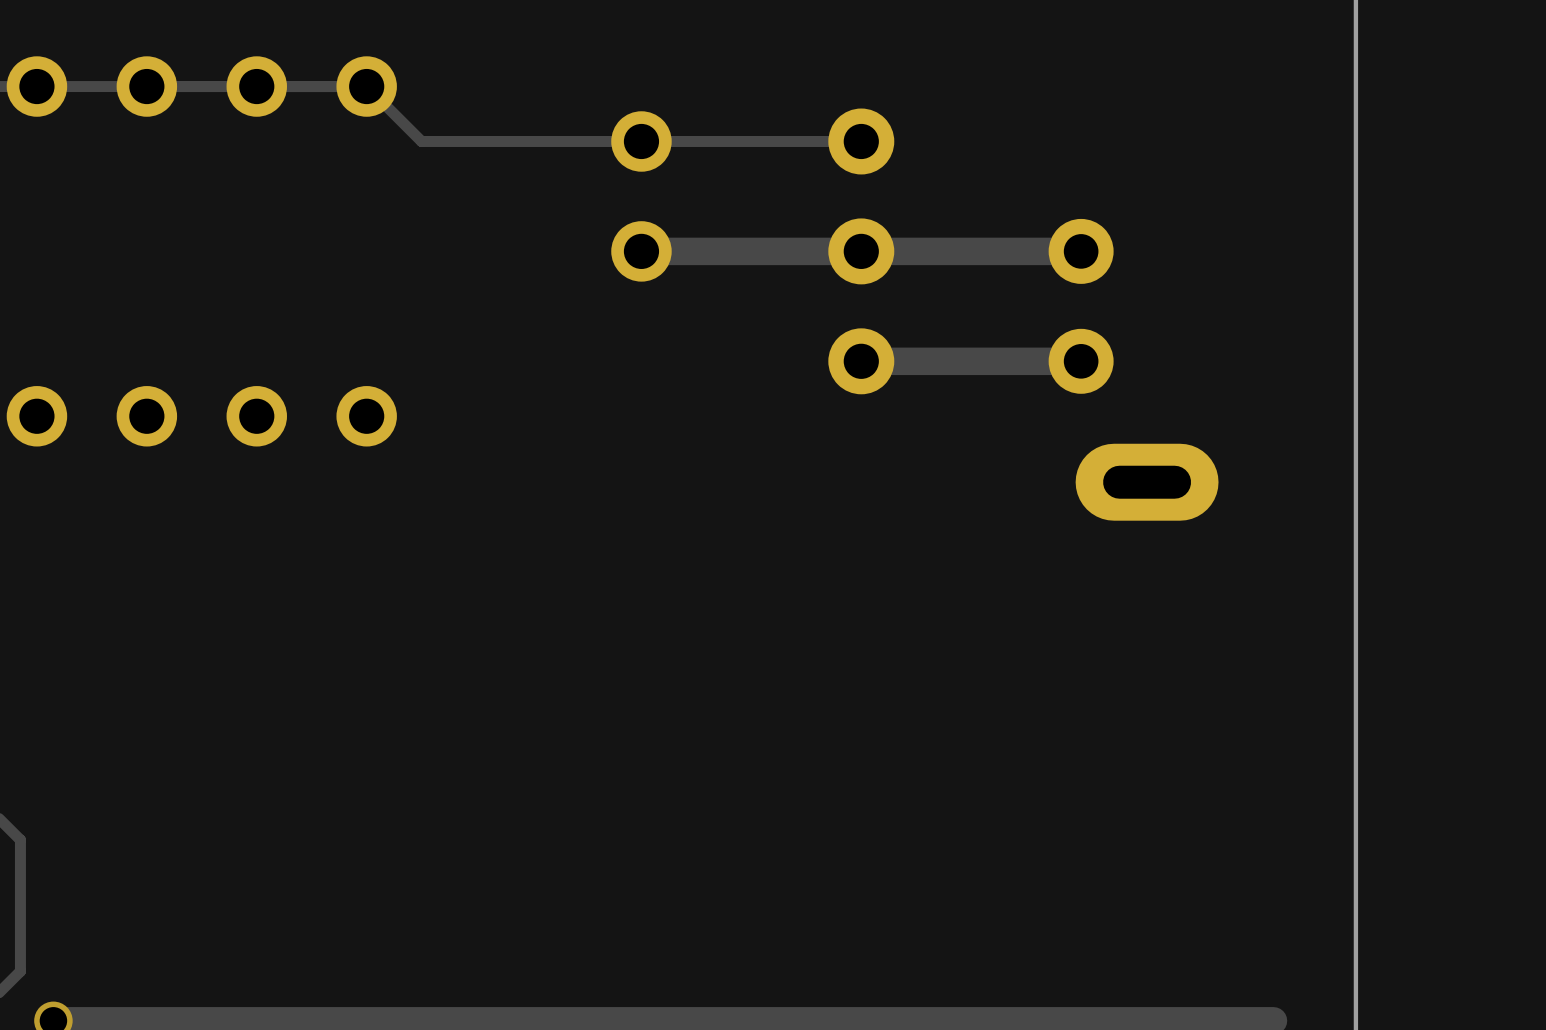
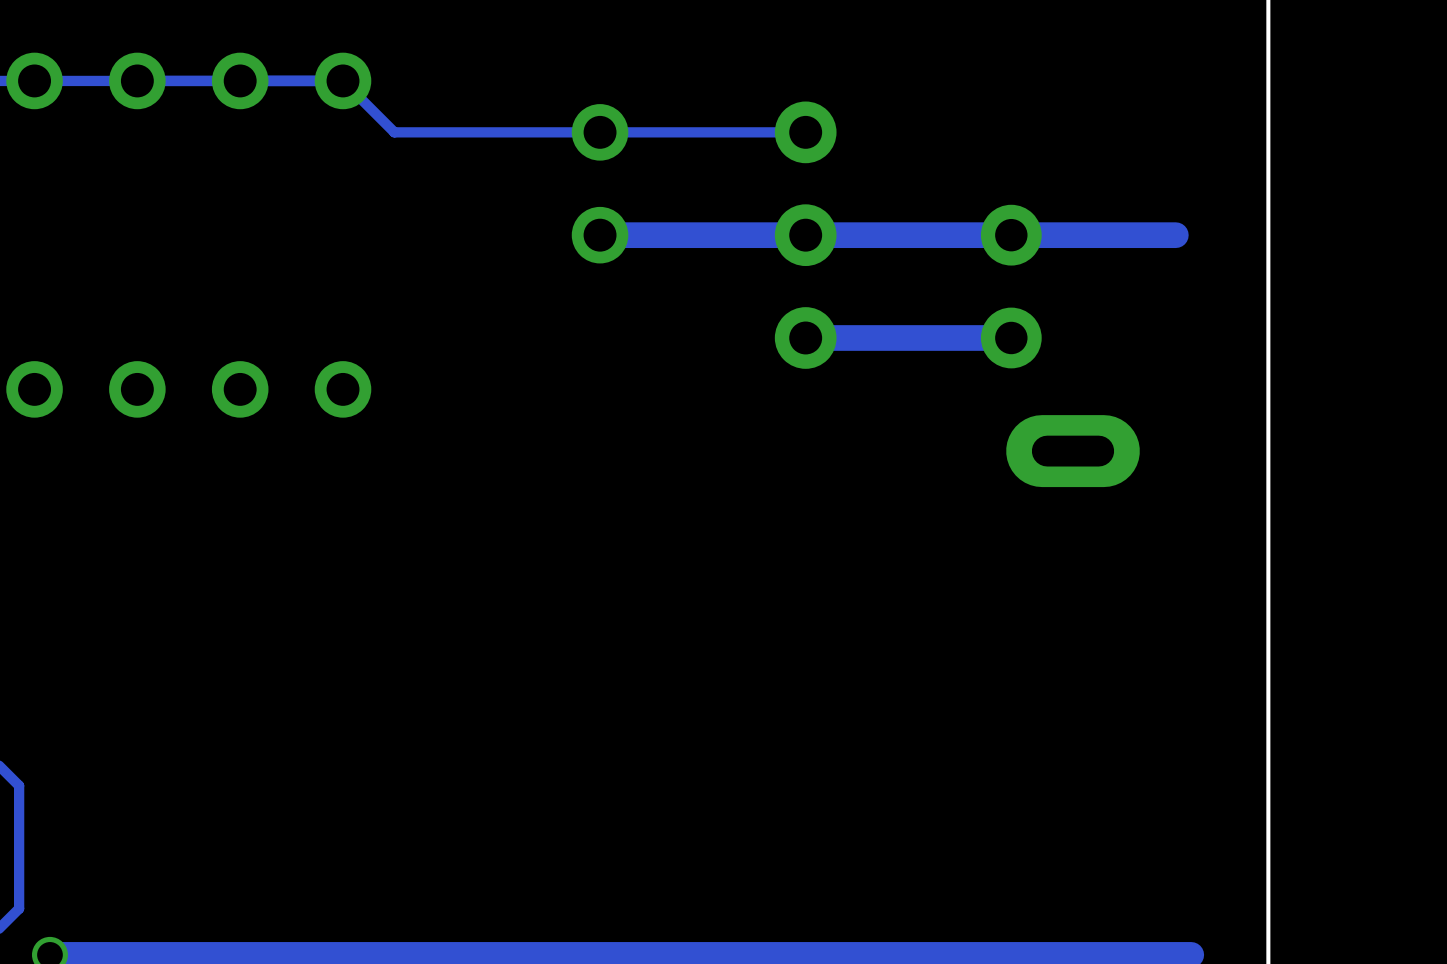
track: none -> (1175, 235) (1011, 235)

